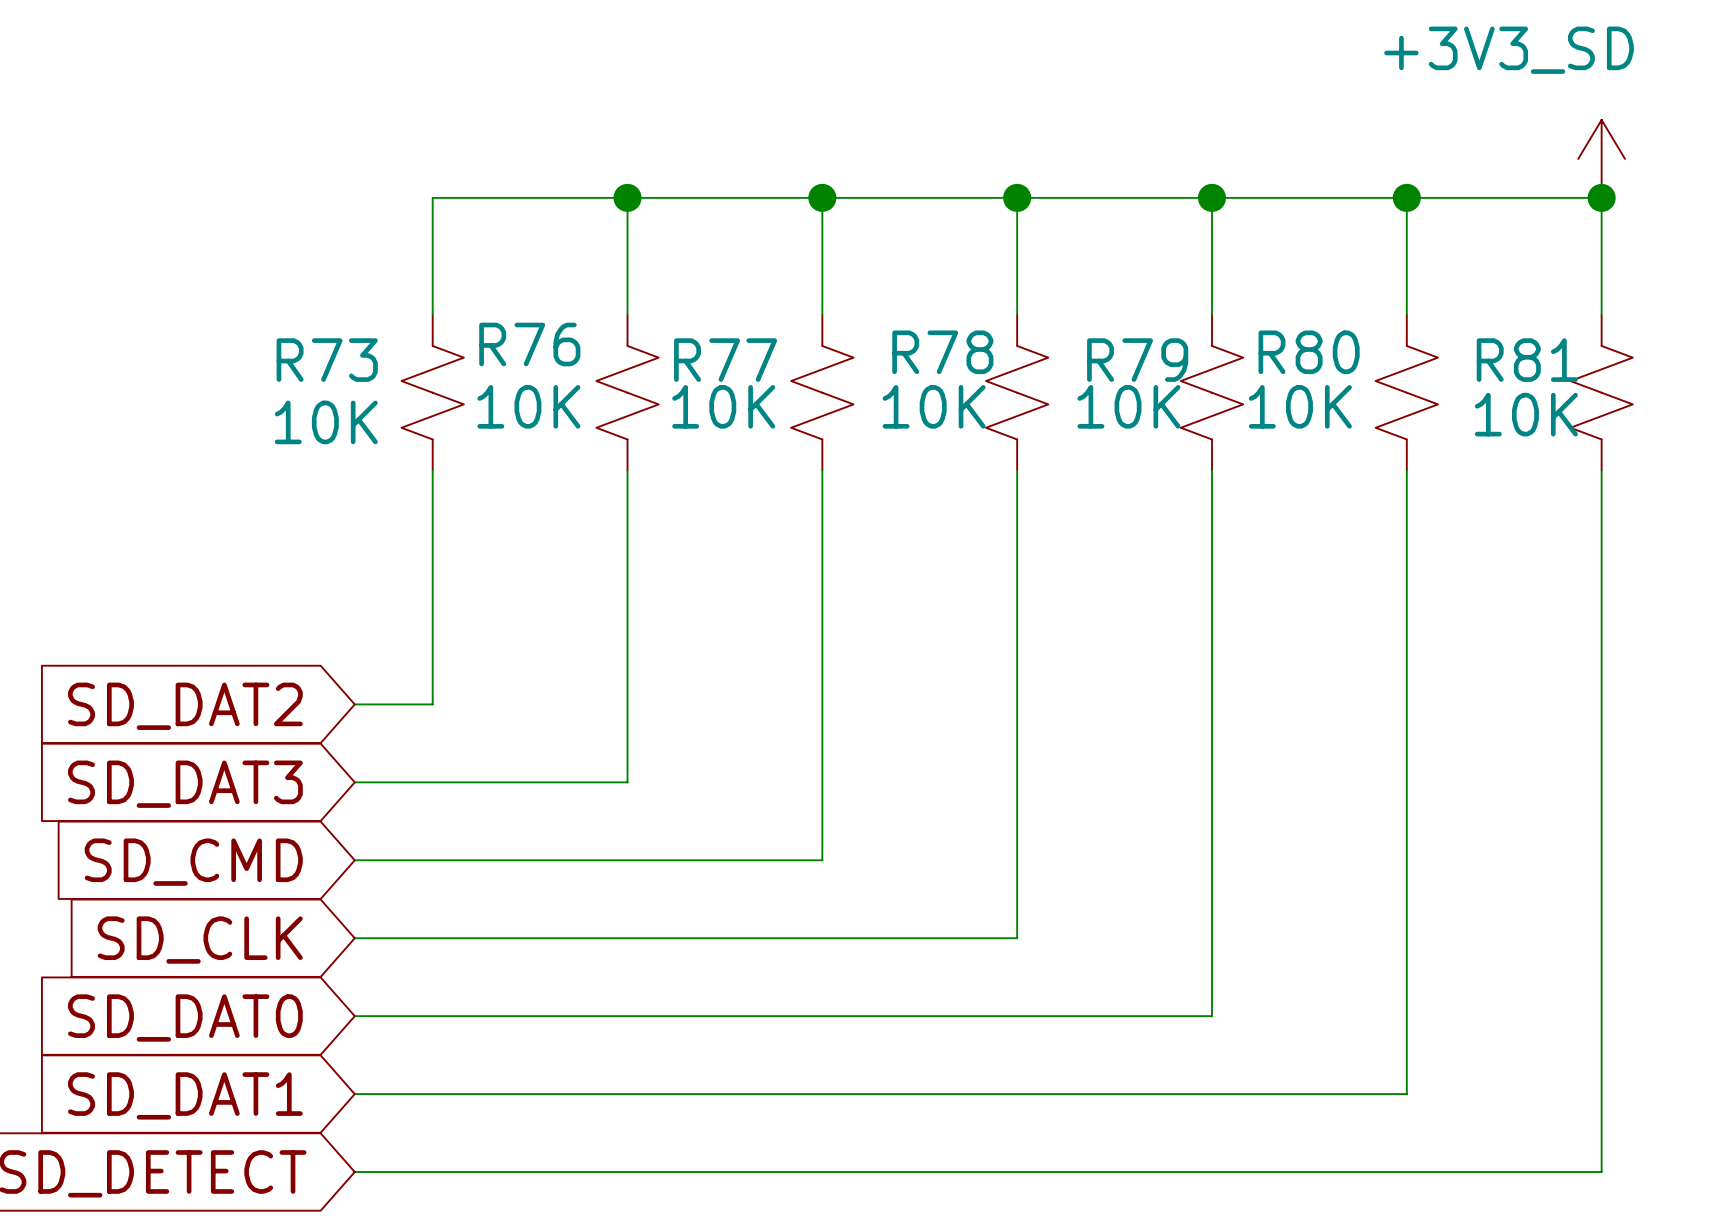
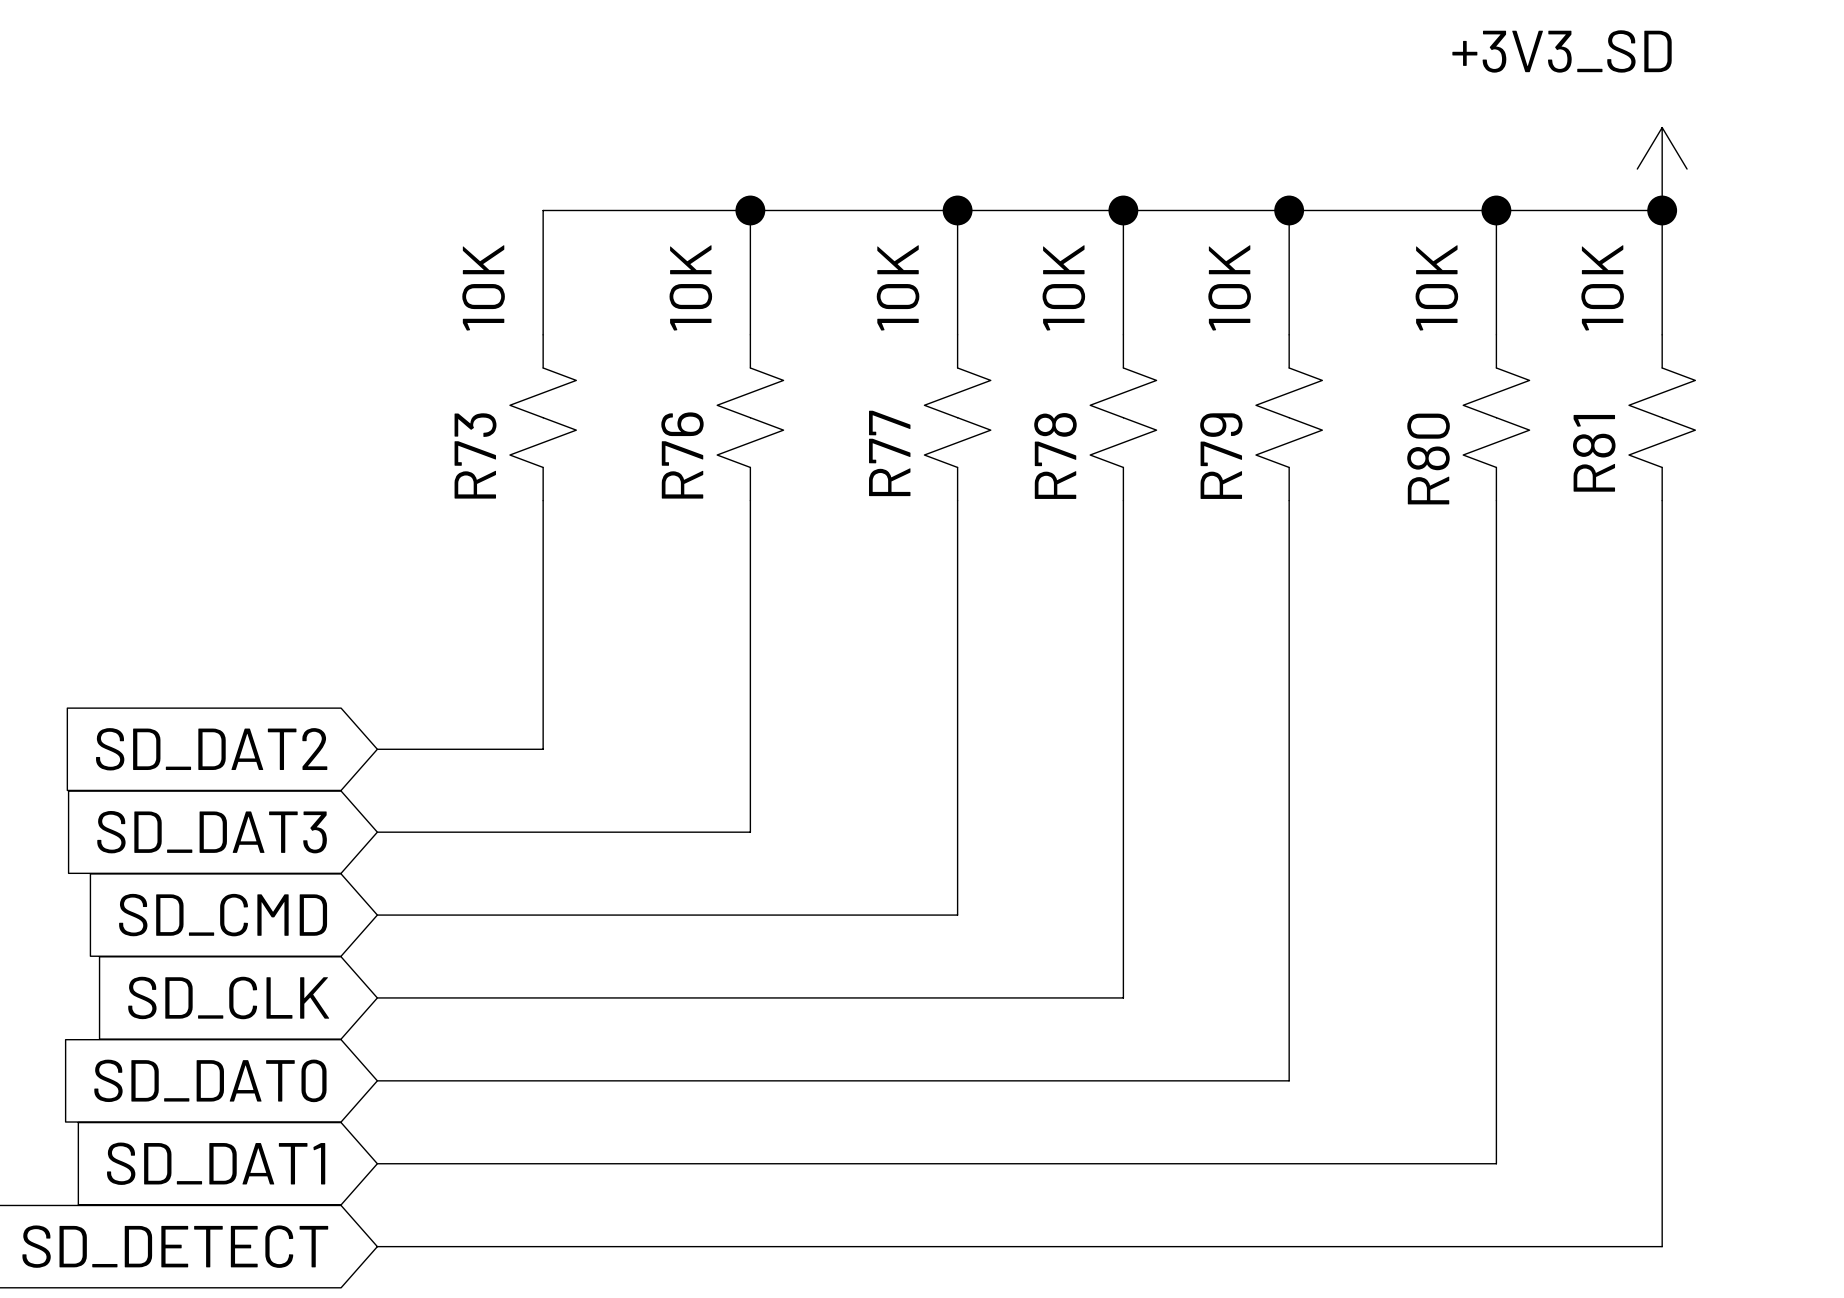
power symbol position: +3V3_SD (1601, 158) -> +3V3_SD (1662, 169)
wire: (510, 197) (432, 197) (432, 314) -> (543, 210) (543, 334)
wire: (627, 197) (627, 314) -> (1123, 210) (1123, 334)
junction: (627, 197) -> none
junction: none -> (750, 210)
wire: (822, 197) (822, 314) -> (750, 210) (750, 334)
junction: (822, 197) -> none
junction: none -> (957, 210)
wire: (1017, 197) (1017, 314) -> (957, 210) (957, 334)
junction position: (1017, 197) -> (1123, 210)
wire: (1562, 197) (1601, 197) (1601, 314) -> (1662, 210) (1662, 334)
junction position: (1601, 197) -> (1662, 210)
R76 name rotation: 0° (529, 344) -> 90° counterclockwise (682, 455)
R78 name rotation: 0° (942, 352) -> 90° counterclockwise (1055, 455)
R80 name rotation: 0° (1309, 352) -> 90° counterclockwise (1428, 459)
R73 name rotation: 0° (327, 360) -> 90° counterclockwise (475, 455)
R77 name rotation: 0° (725, 360) -> 90° counterclockwise (889, 453)
R79 name rotation: 0° (1137, 360) -> 90° counterclockwise (1221, 456)
R81 name rotation: 0° (1527, 360) -> 90° counterclockwise (1594, 453)
R73 position: (432, 392) -> (543, 417)
R76 position: (627, 392) -> (750, 417)
R77 position: (822, 392) -> (957, 417)
R78 position: (1017, 392) -> (1123, 417)
R81 position: (1601, 392) -> (1662, 417)
R76 value rotation: 0° (528, 406) -> 90° counterclockwise (690, 287)
R77 value rotation: 0° (723, 406) -> 90° counterclockwise (898, 287)
R78 value rotation: 0° (934, 406) -> 90° counterclockwise (1063, 287)
R79 value rotation: 0° (1128, 406) -> 90° counterclockwise (1229, 287)
R80 value rotation: 0° (1300, 406) -> 90° counterclockwise (1436, 287)
R81 value rotation: 0° (1526, 414) -> 90° counterclockwise (1602, 287)
R73 value rotation: 0° (326, 422) -> 90° counterclockwise (483, 287)
R73 value position: 10K (326, 422) -> 10K (483, 287)
wire: (432, 470) (432, 704) -> (543, 500) (543, 749) (460, 749)
wire: (627, 470) (627, 782) -> (750, 500) (750, 832) (667, 832)
wire: (822, 470) (822, 860) -> (957, 500) (957, 915) (874, 915)
wire: (1017, 470) (1017, 938) -> (1123, 500) (1123, 997) (1081, 997)
wire: (1601, 470) (1601, 1172) (1562, 1172) -> (1662, 500) (1662, 1246)

